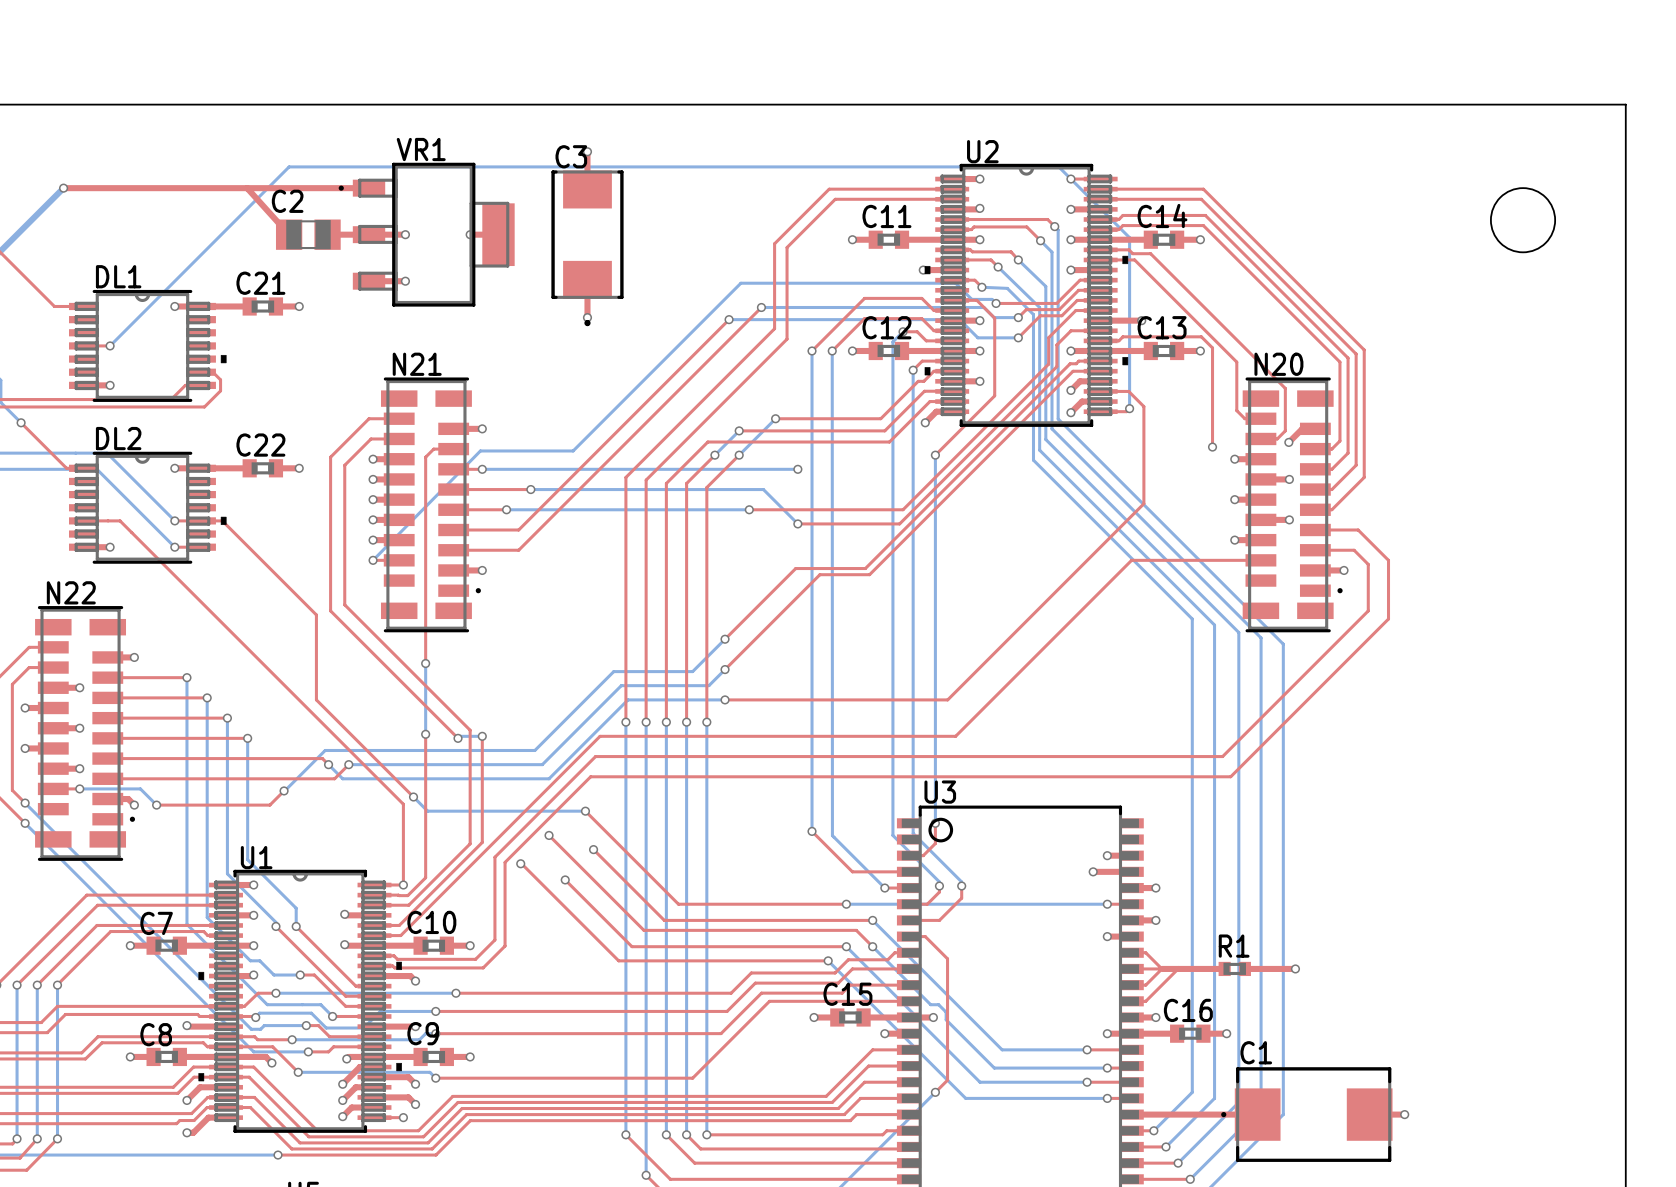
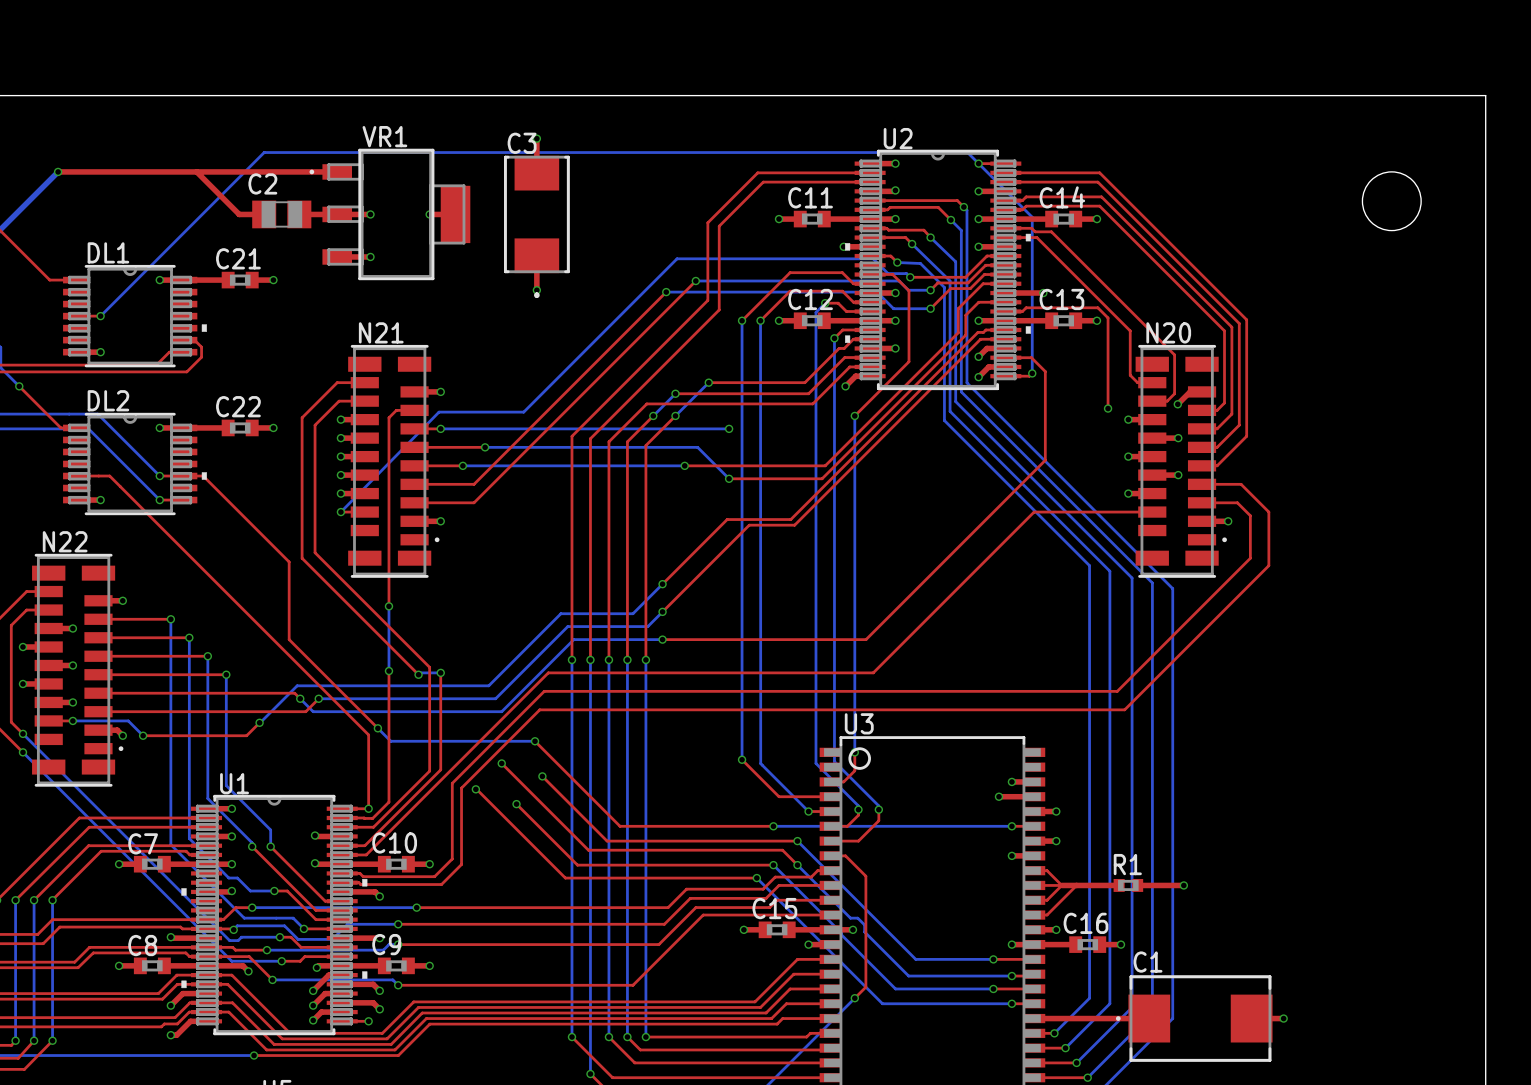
top track: none -> (196, 171) (239, 214) (258, 214)
top track: (247, 188) (289, 234) -> none

